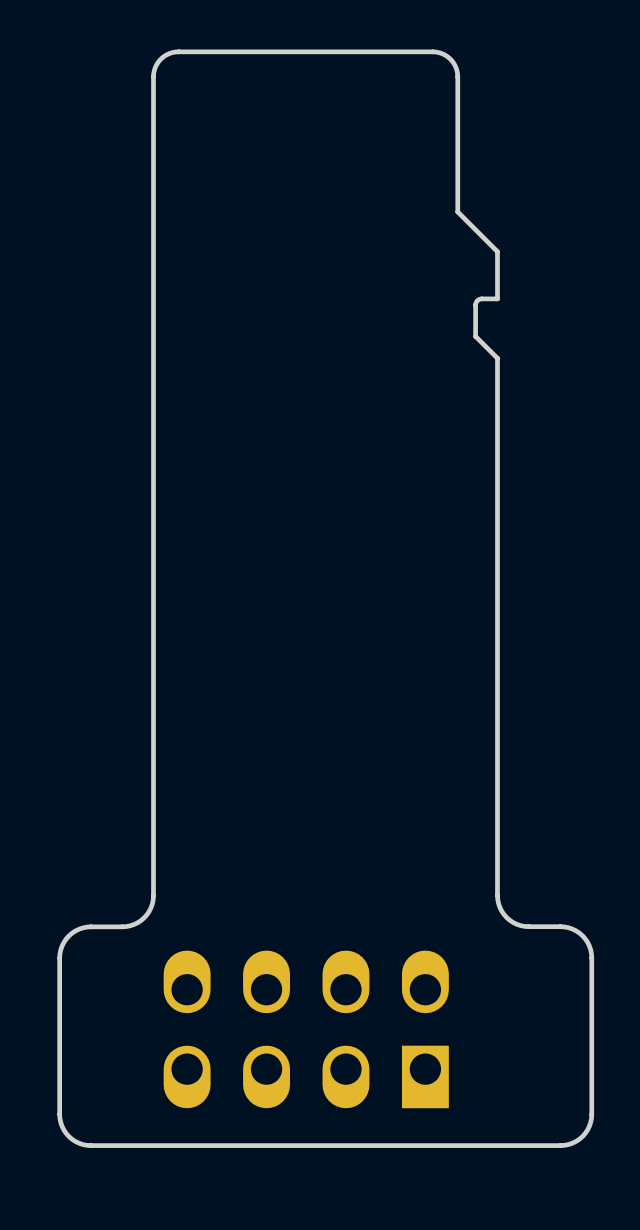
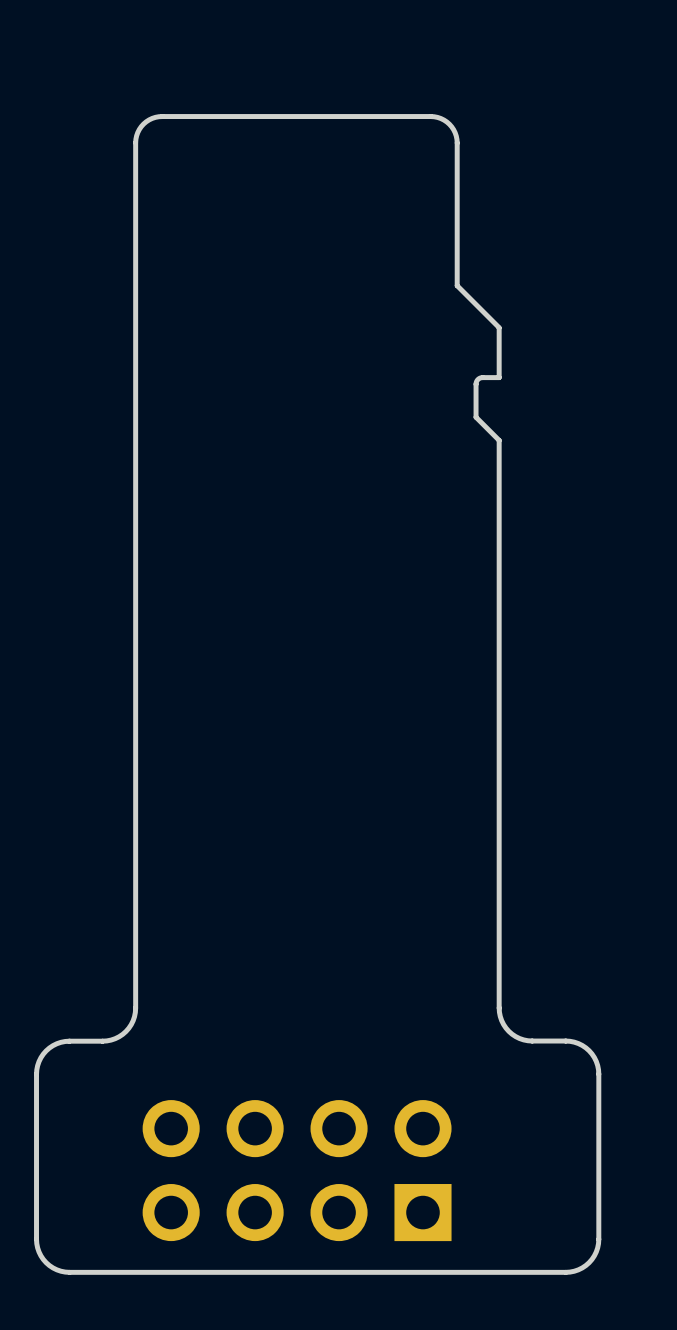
part footprint: [163, 950, 449, 1109] -> [142, 1100, 452, 1242]

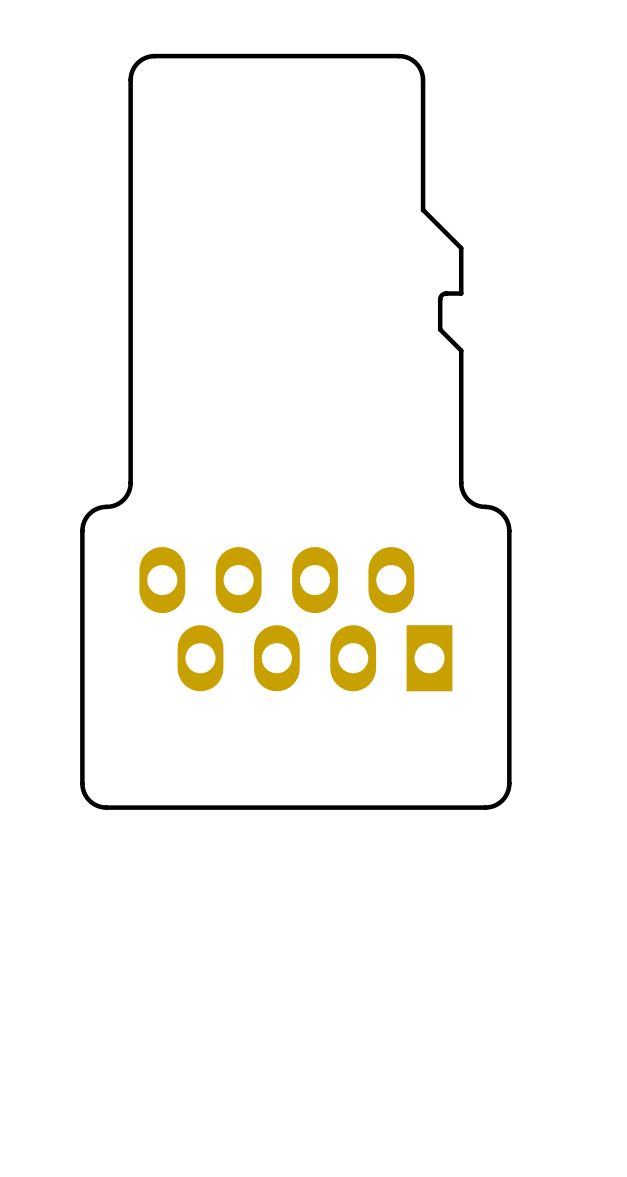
board edge: (135, 585) (135, 1012) (128, 1028) (115, 1038) (102, 1041) (69, 1041) -> (130, 482) (128, 492) (123, 499) (115, 505) (106, 506)
board edge: (499, 585) (499, 1012) (506, 1028) (515, 1036) (527, 1040) (574, 1042) (589, 1050) (596, 1061) (598, 1074) (598, 1239) (596, 1251) (589, 1262) (578, 1269) (565, 1272) (69, 1272) (56, 1269) (43, 1259) (36, 1243) (36, 1074) (39, 1061) (46, 1050) (56, 1043) (69, 1041) -> (461, 482) (463, 492) (468, 499) (476, 505) (491, 507) (499, 511) (506, 518) (509, 527) (509, 783)
board edge: none -> (106, 506) (97, 508) (89, 513) (84, 521) (82, 530) (82, 783) (84, 792) (91, 802) (106, 807) (485, 807) (494, 805) (502, 800) (507, 792) (509, 783)
part: none -> (295, 619)
part: (297, 1170) -> none

